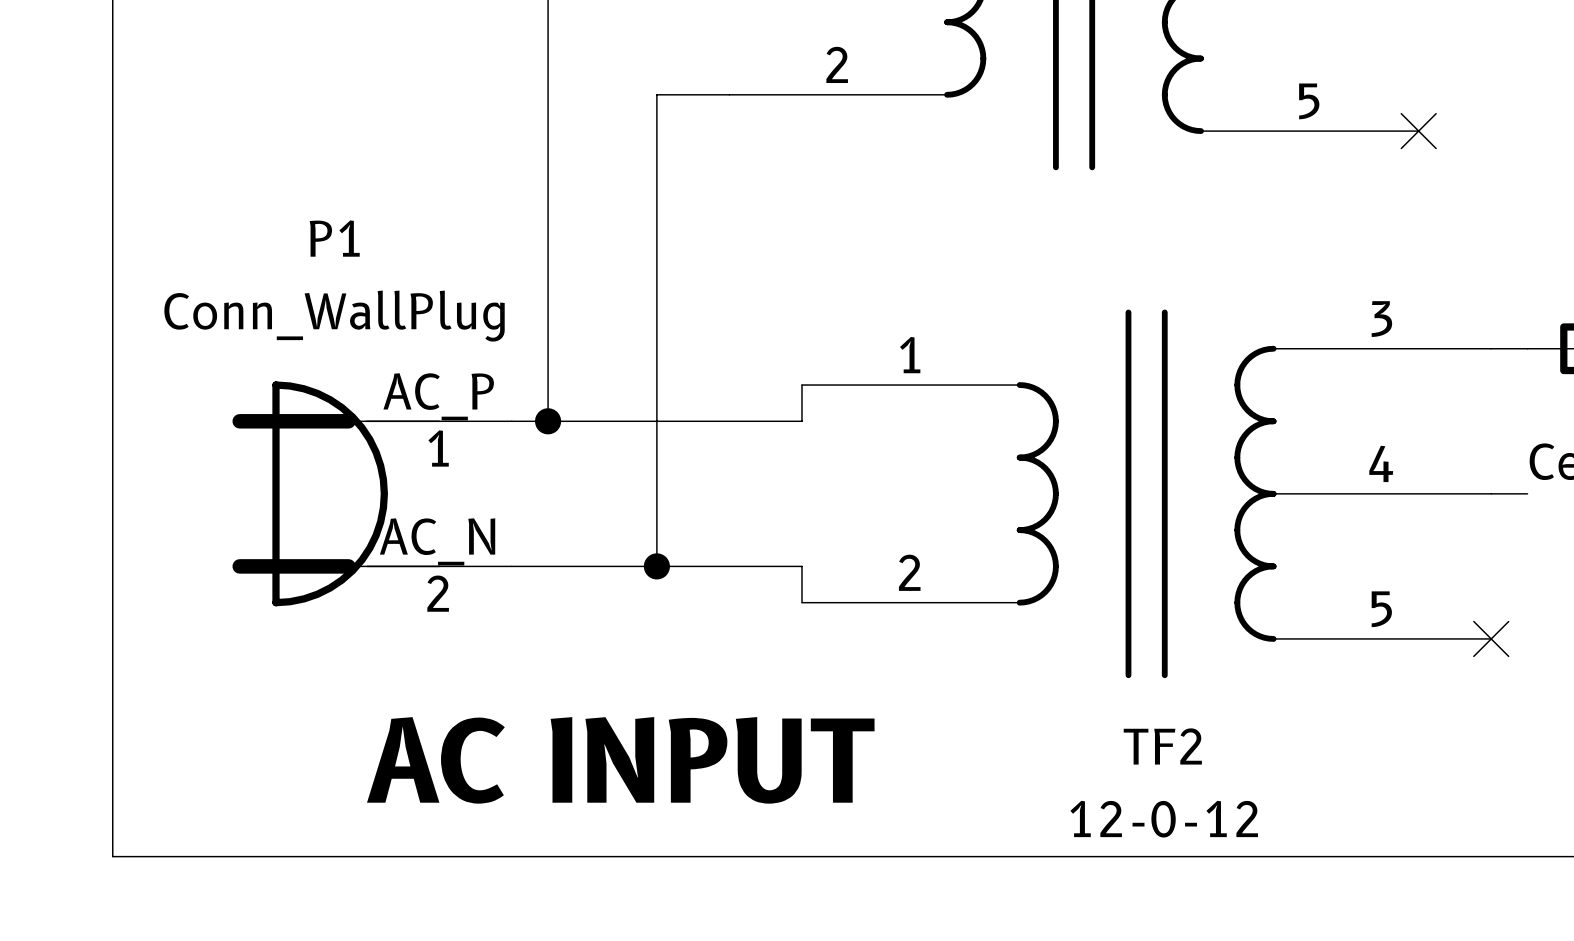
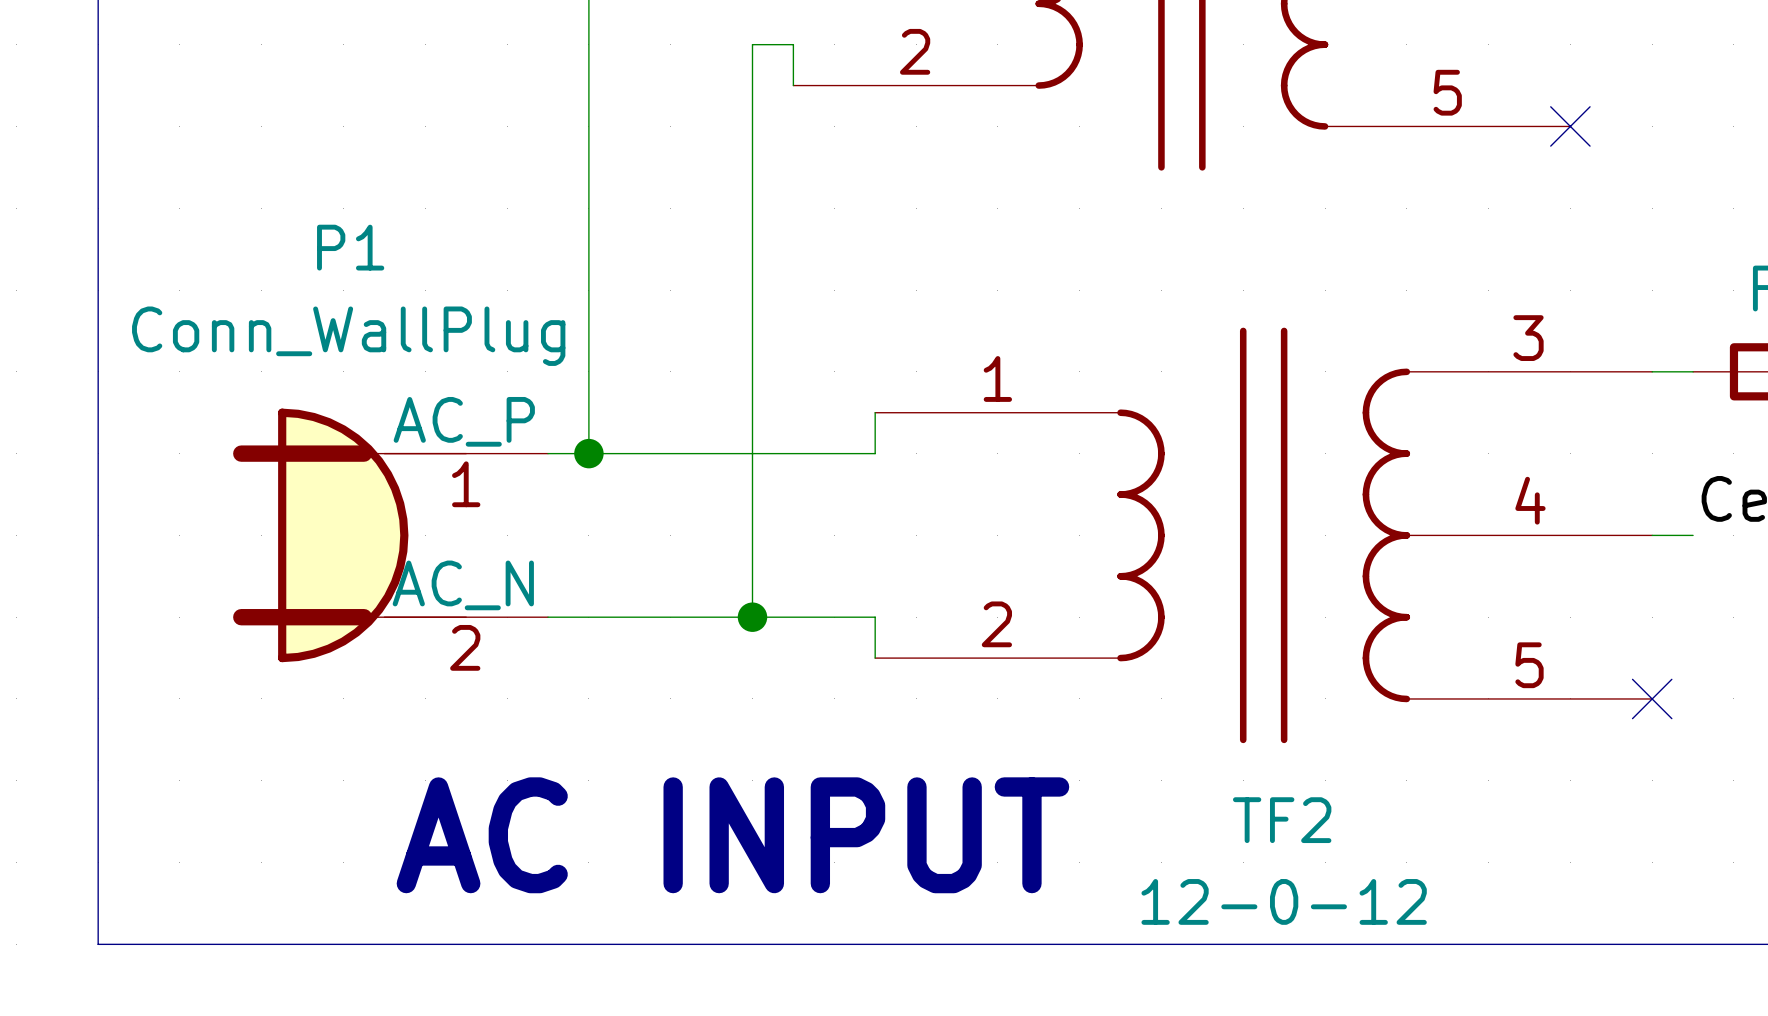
wire: (729, 94) (656, 94) (656, 566) -> (793, 85) (793, 44) (752, 44) (752, 617)
junction position: (656, 566) -> (752, 617)

